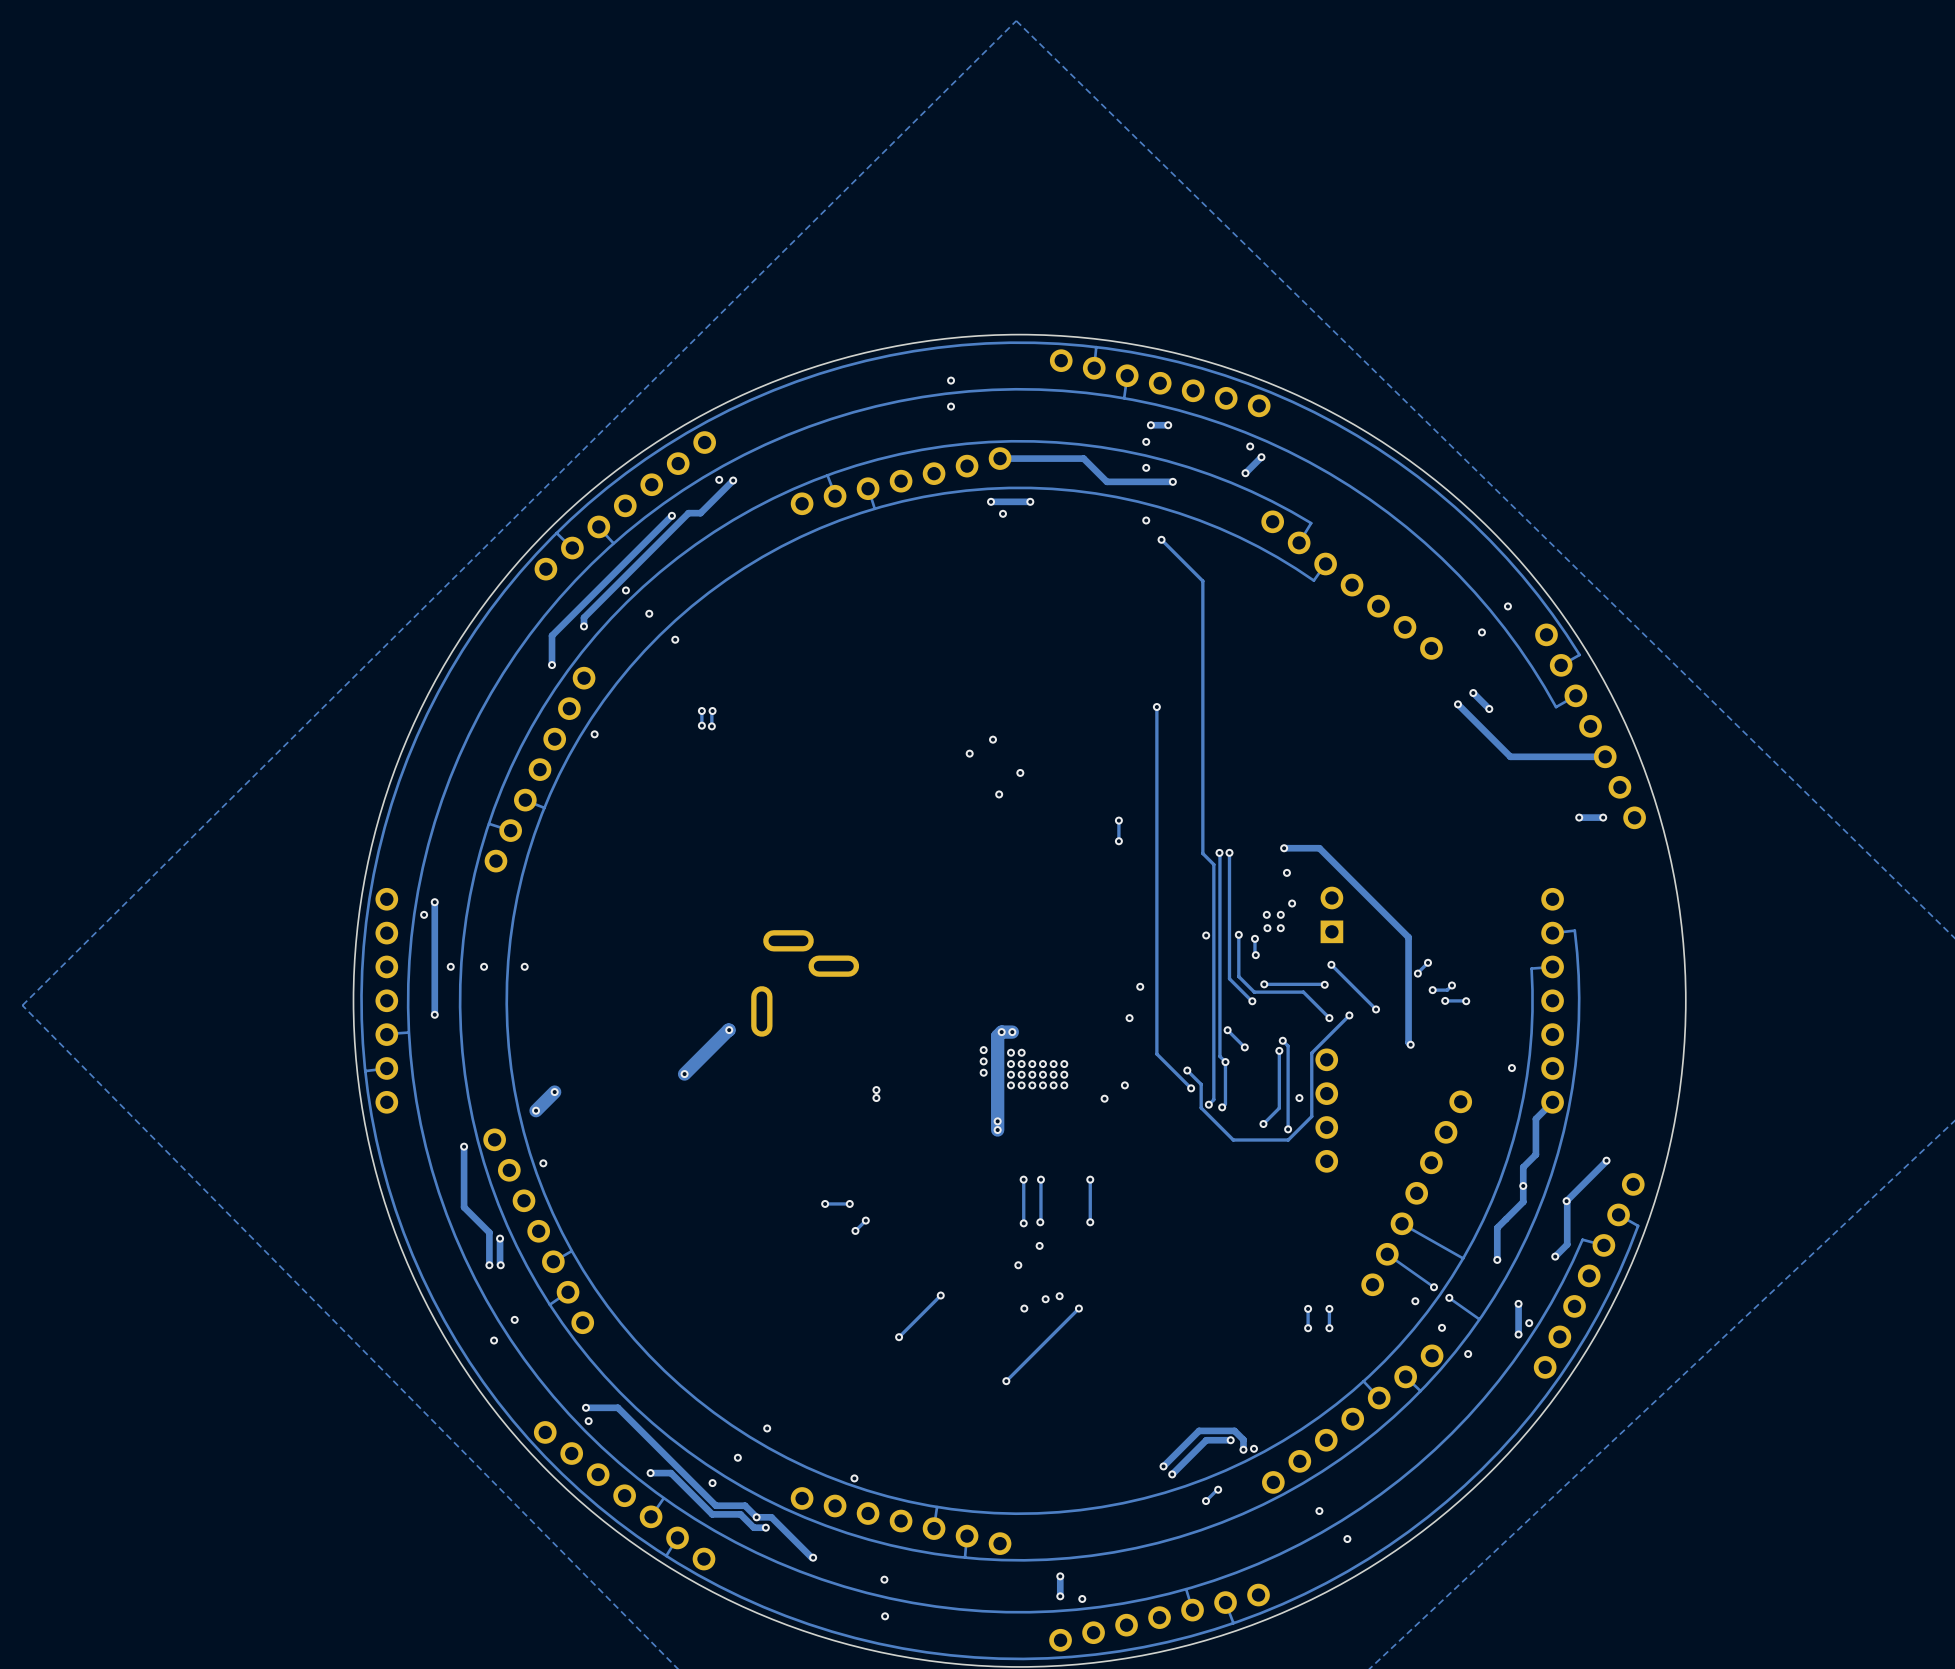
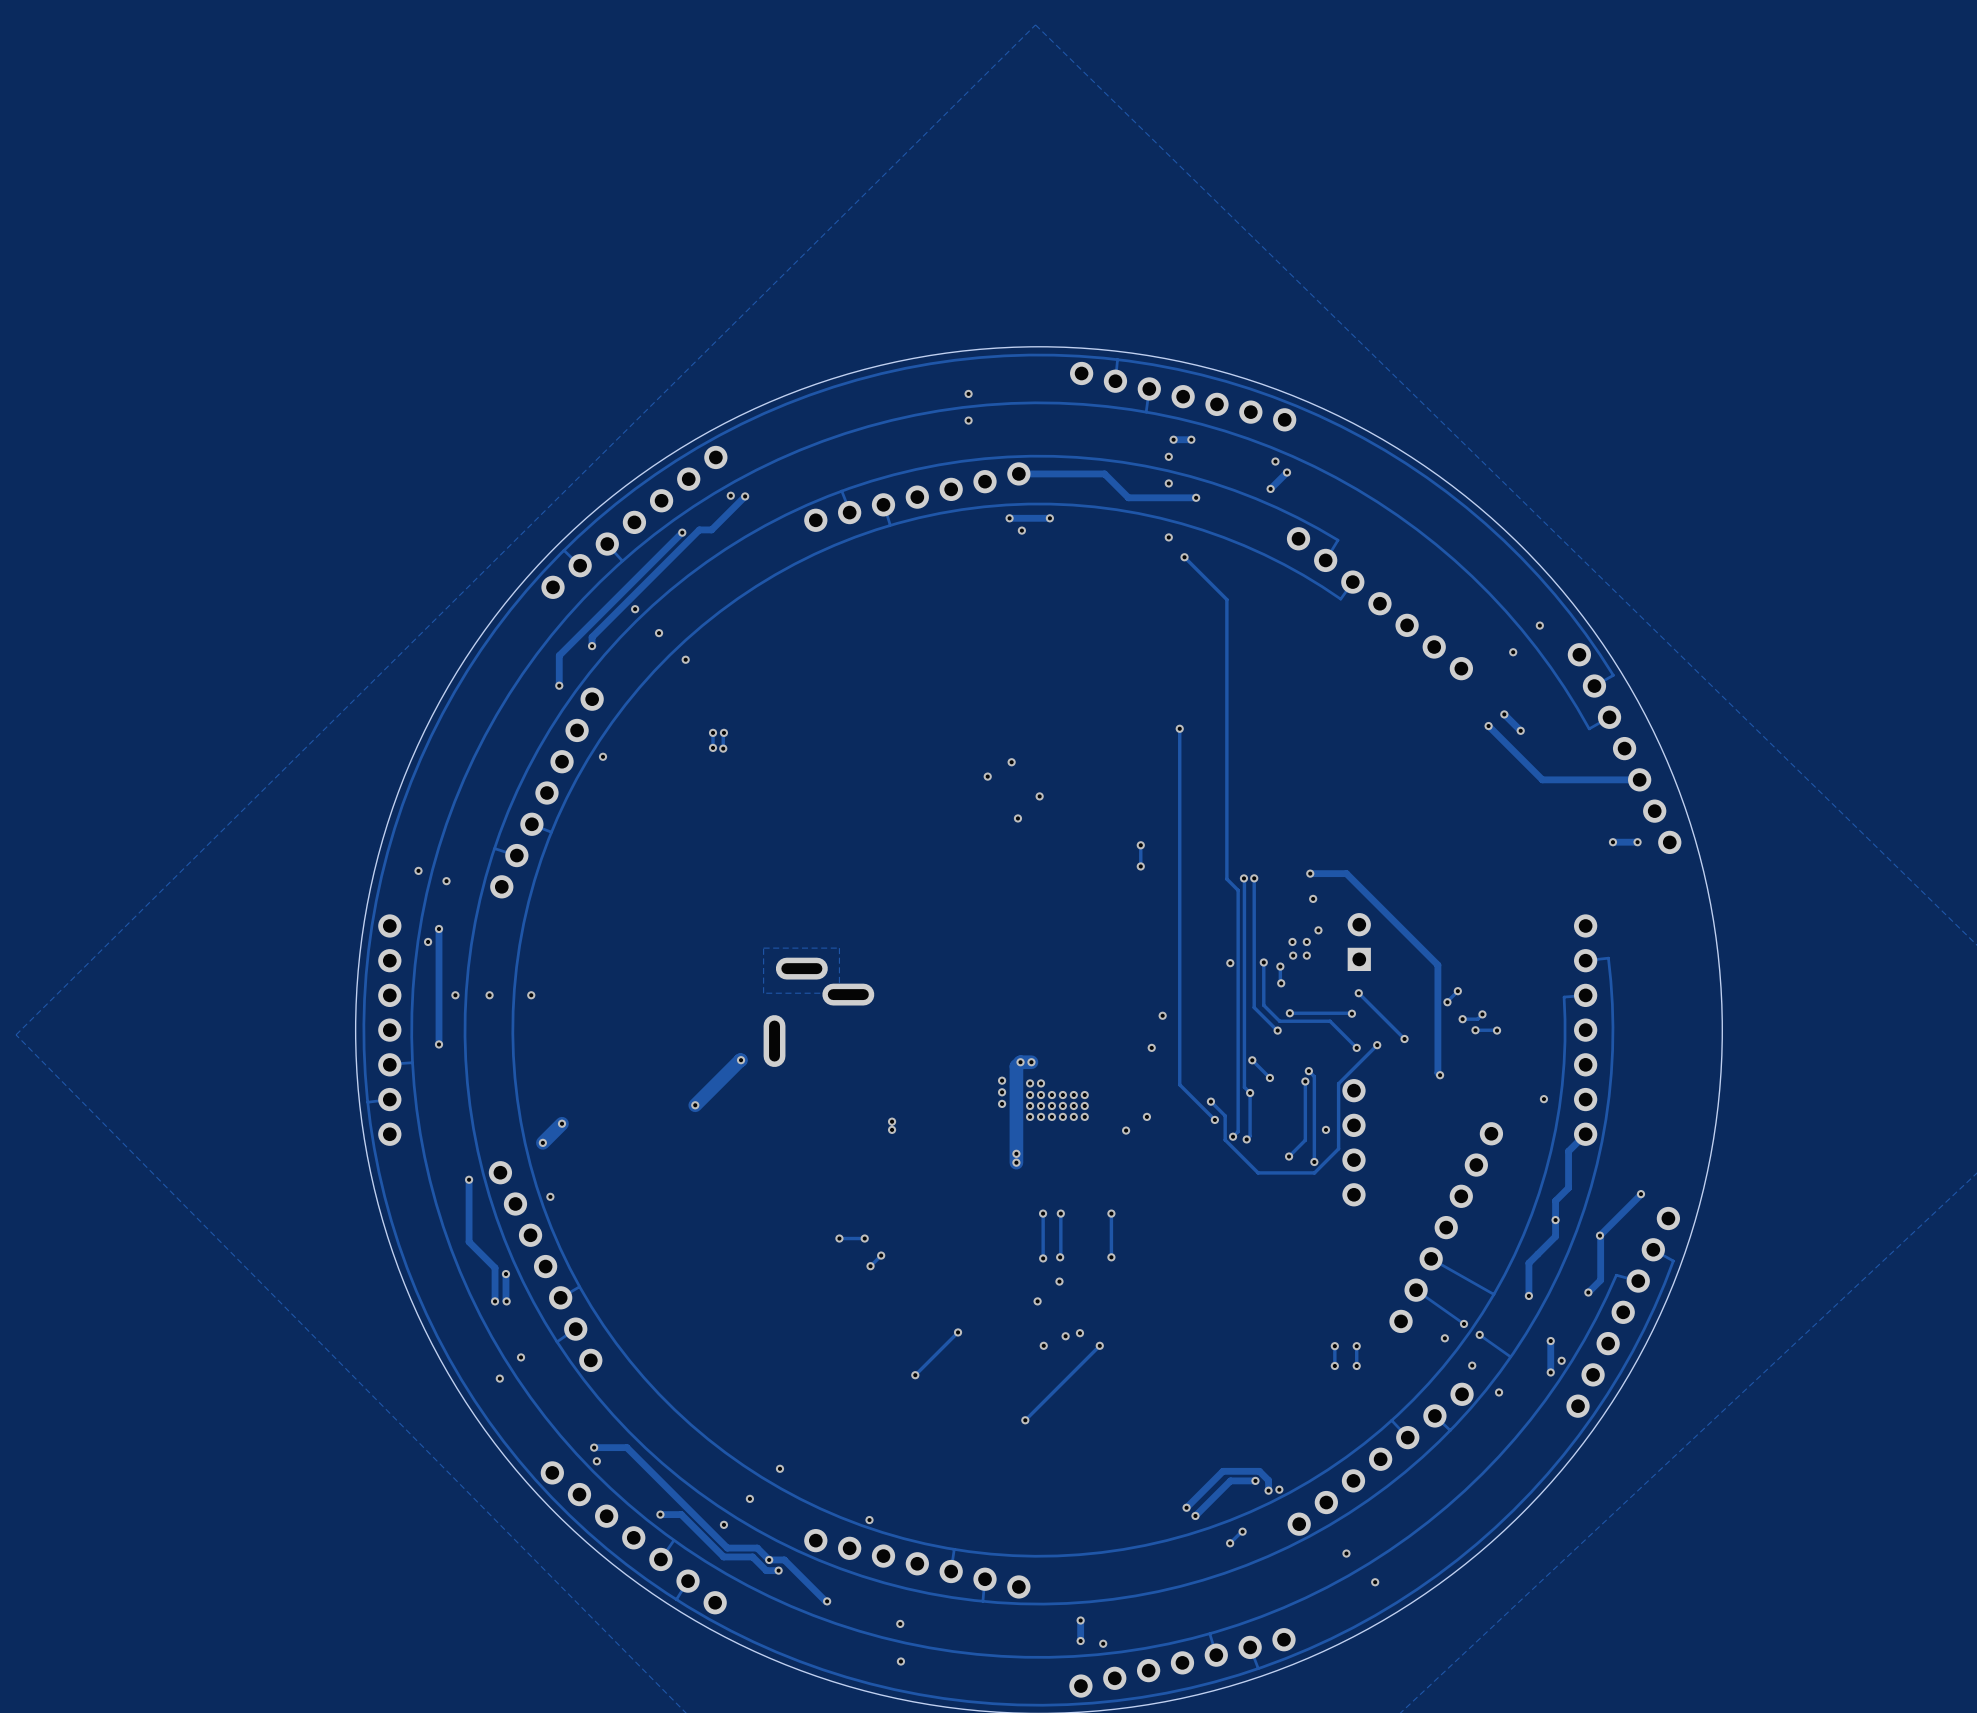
via: none -> (418, 870)
via: none -> (446, 881)
zone outline: none -> (839, 948) (839, 993) (763, 993) (763, 948) (839, 948)

